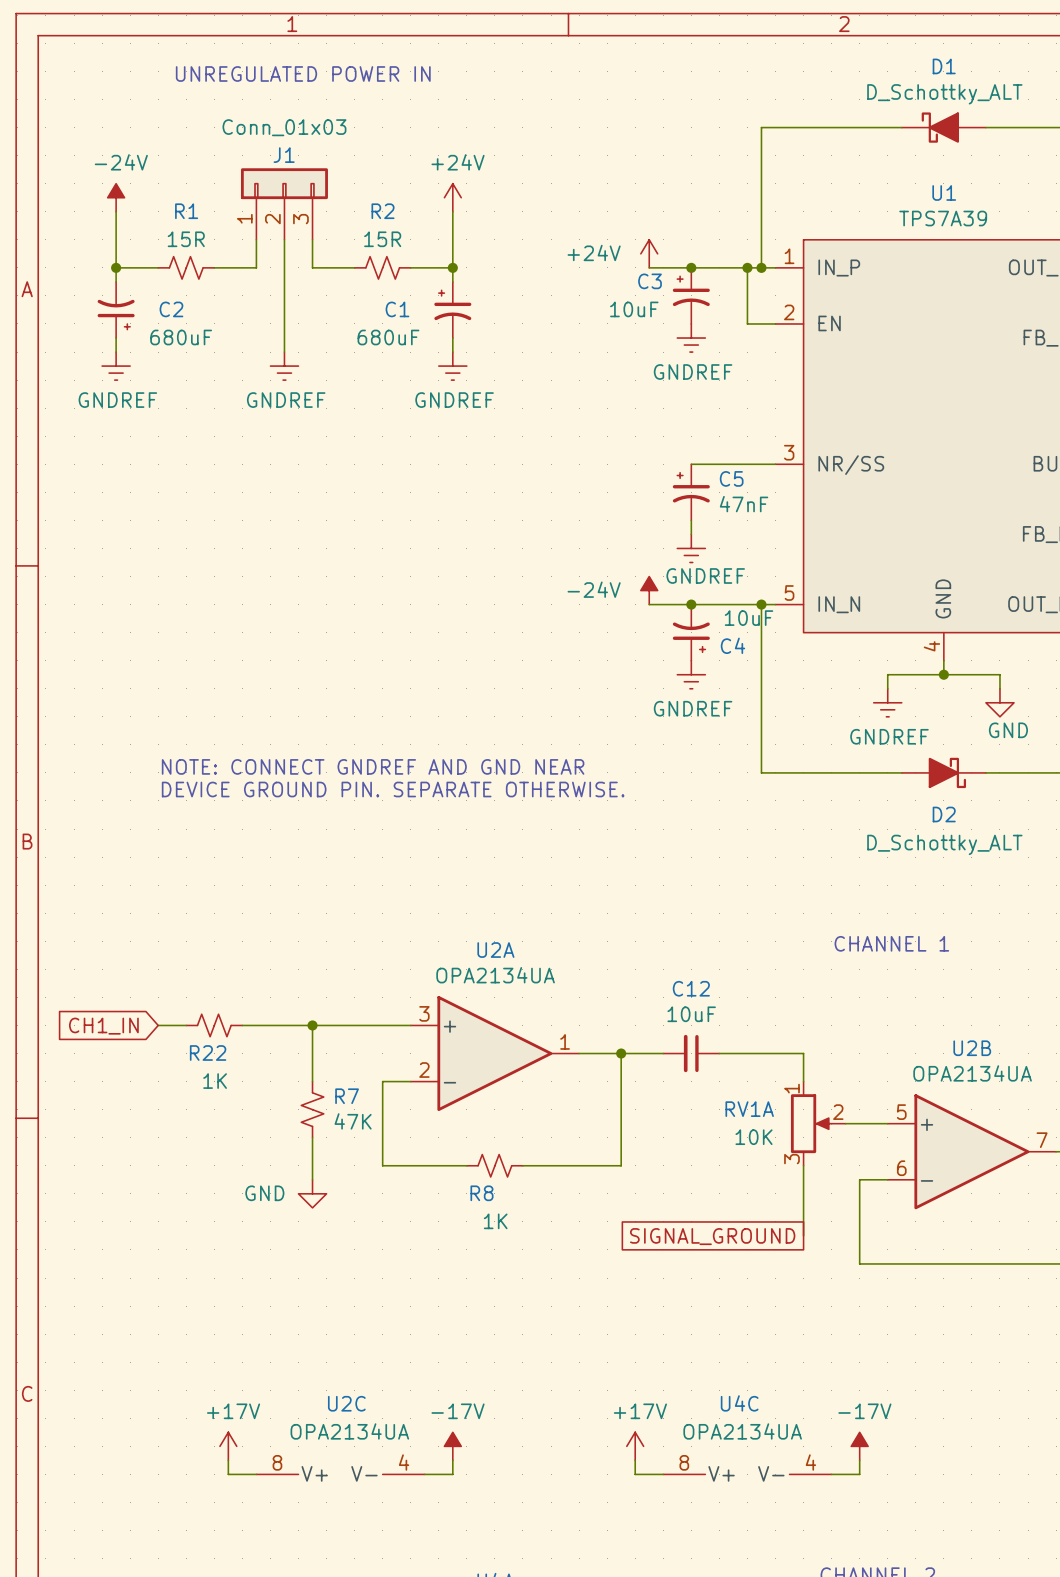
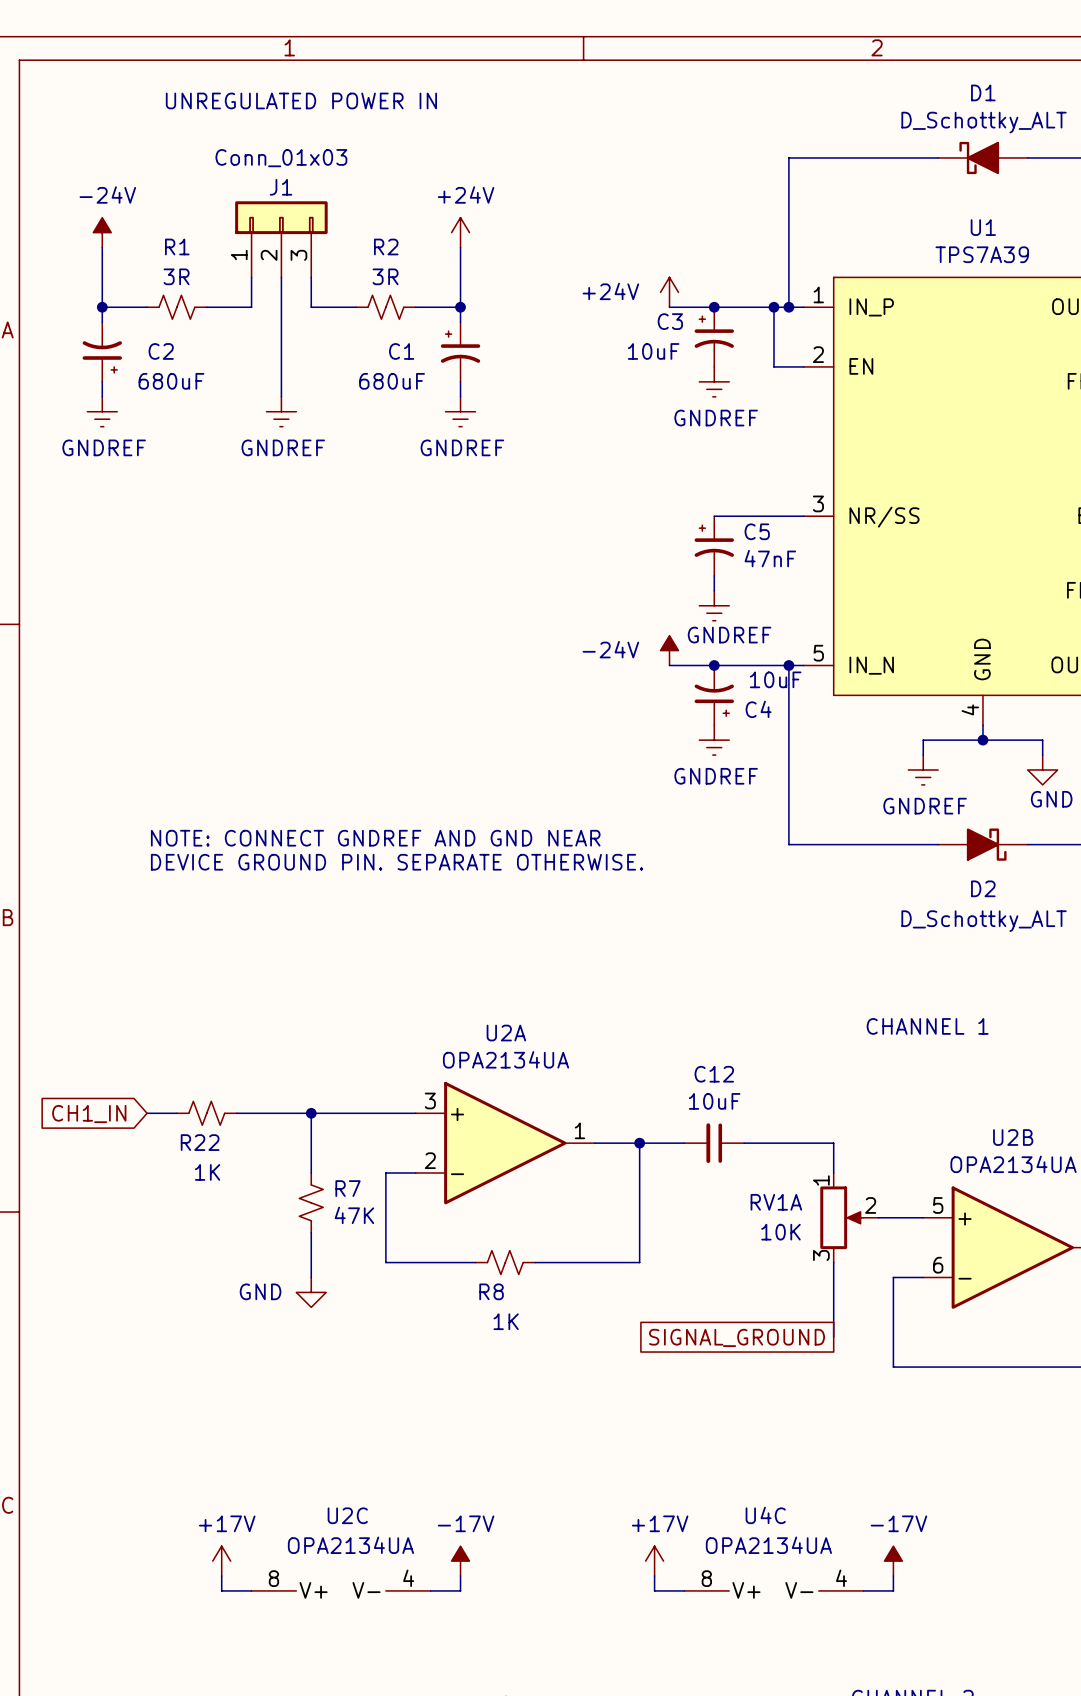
R1 value: 15R (186, 239) -> 3R (176, 276)
R2 value: 15R (382, 239) -> 3R (385, 276)

